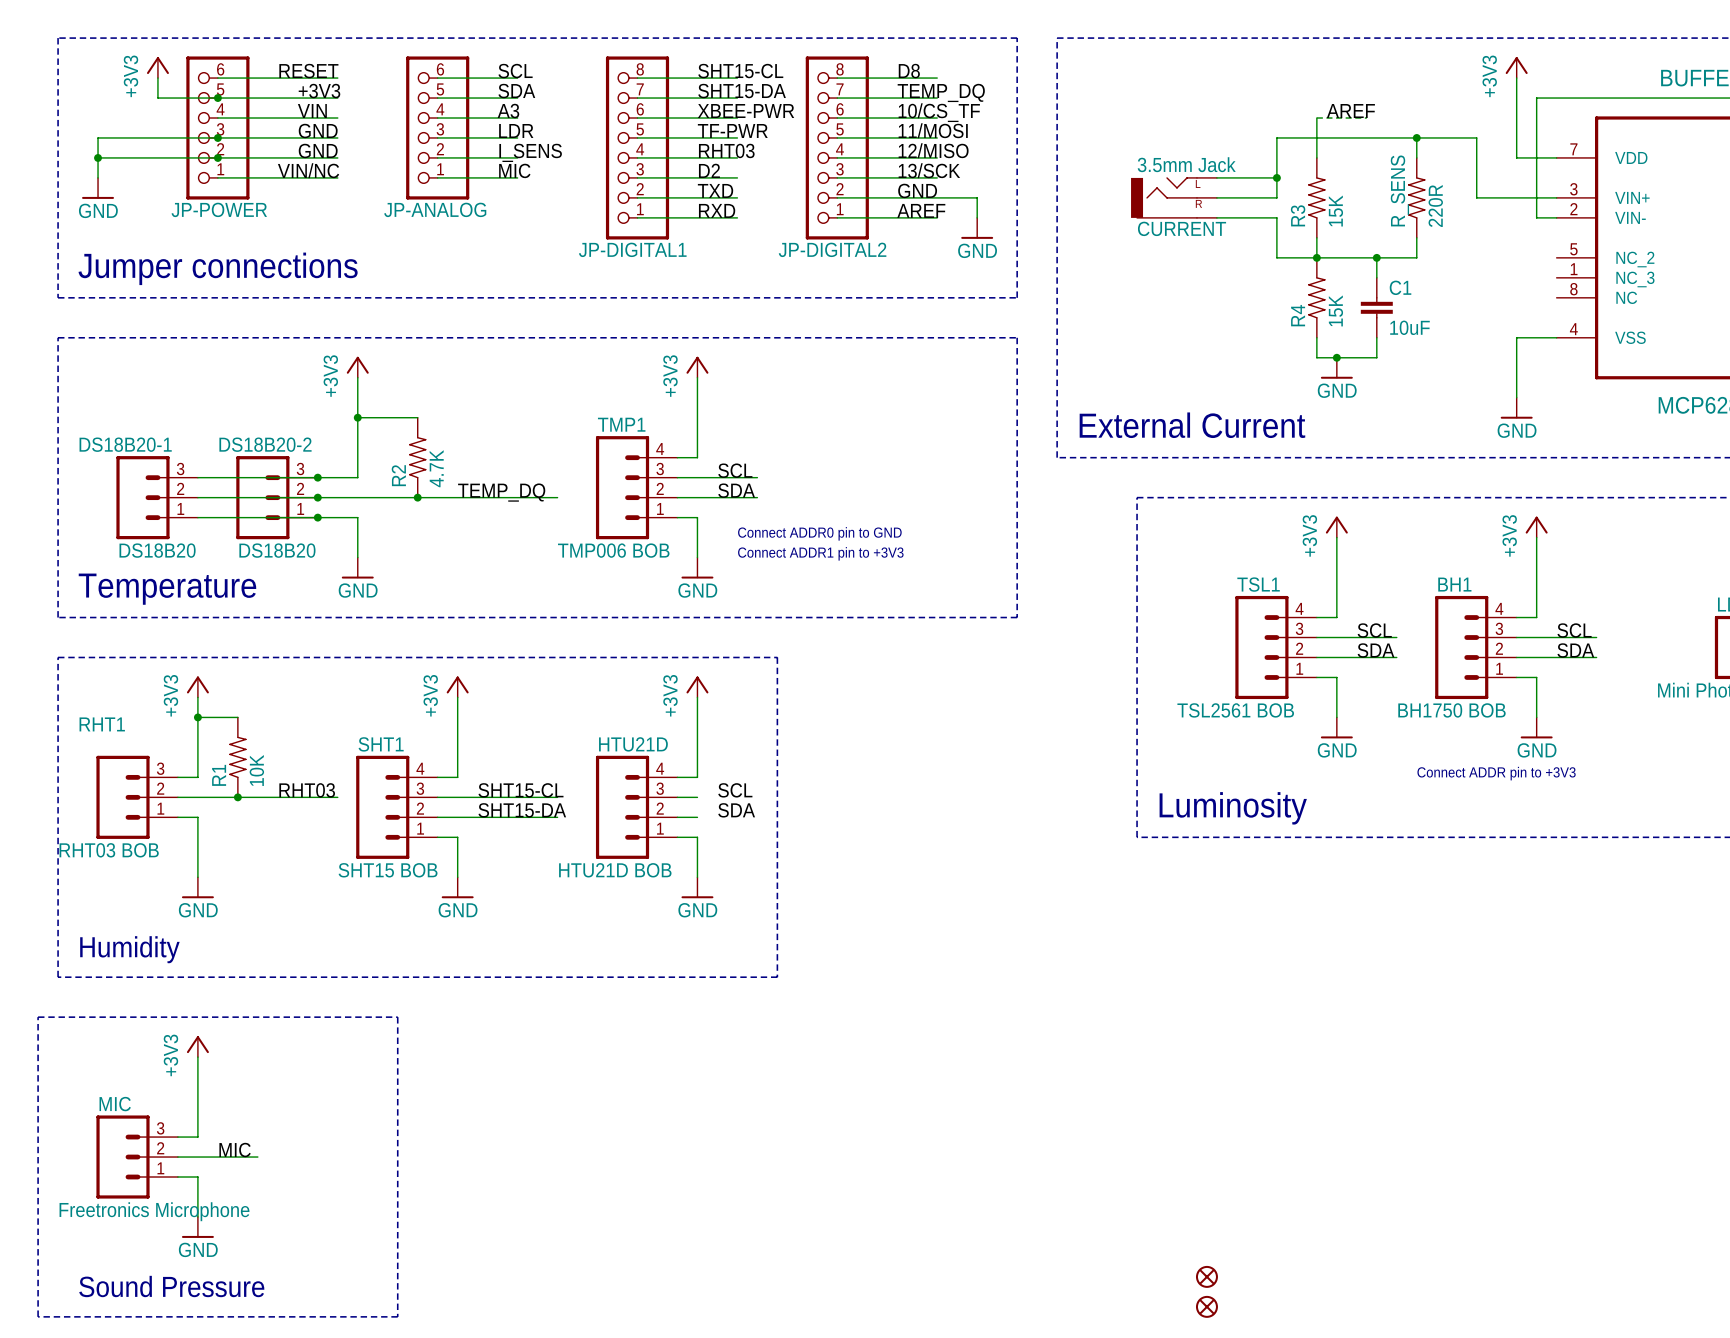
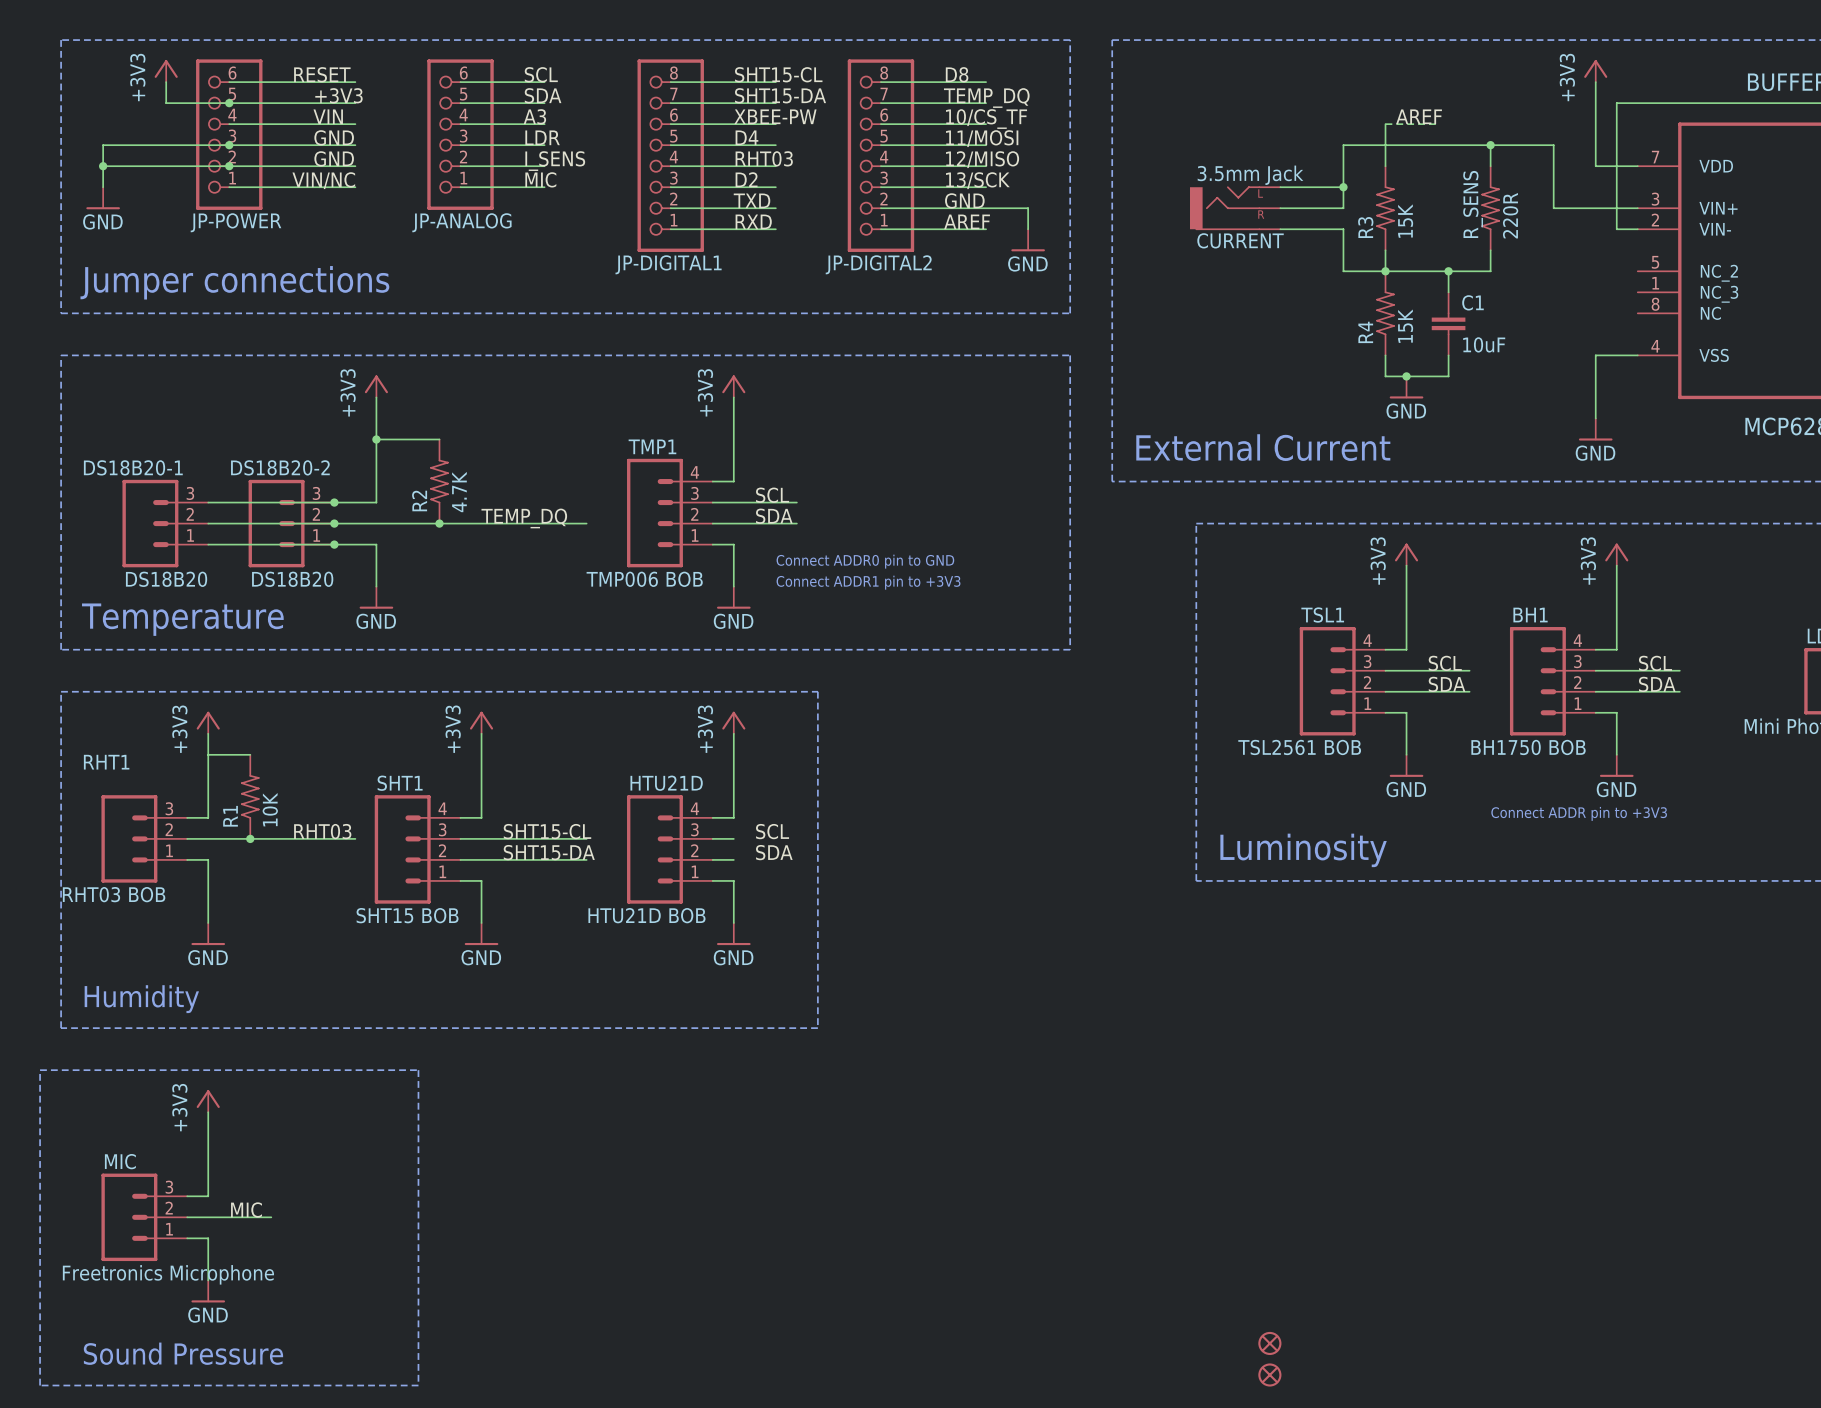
label: XBEE-PWR (746, 111) -> XBEE-PW (775, 116)
label: TF-PWR (732, 130) -> D4 (746, 137)
junction: (197, 717) -> none

